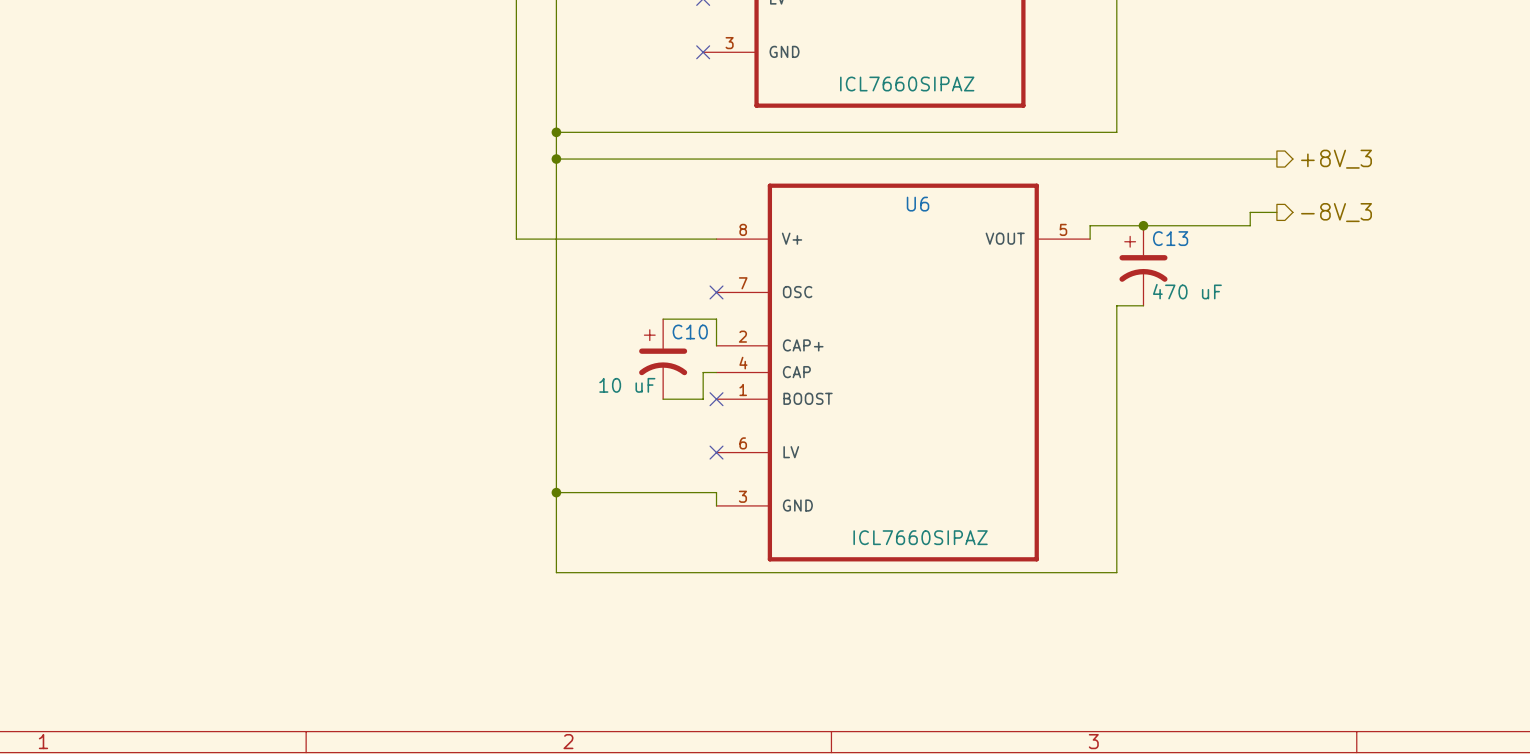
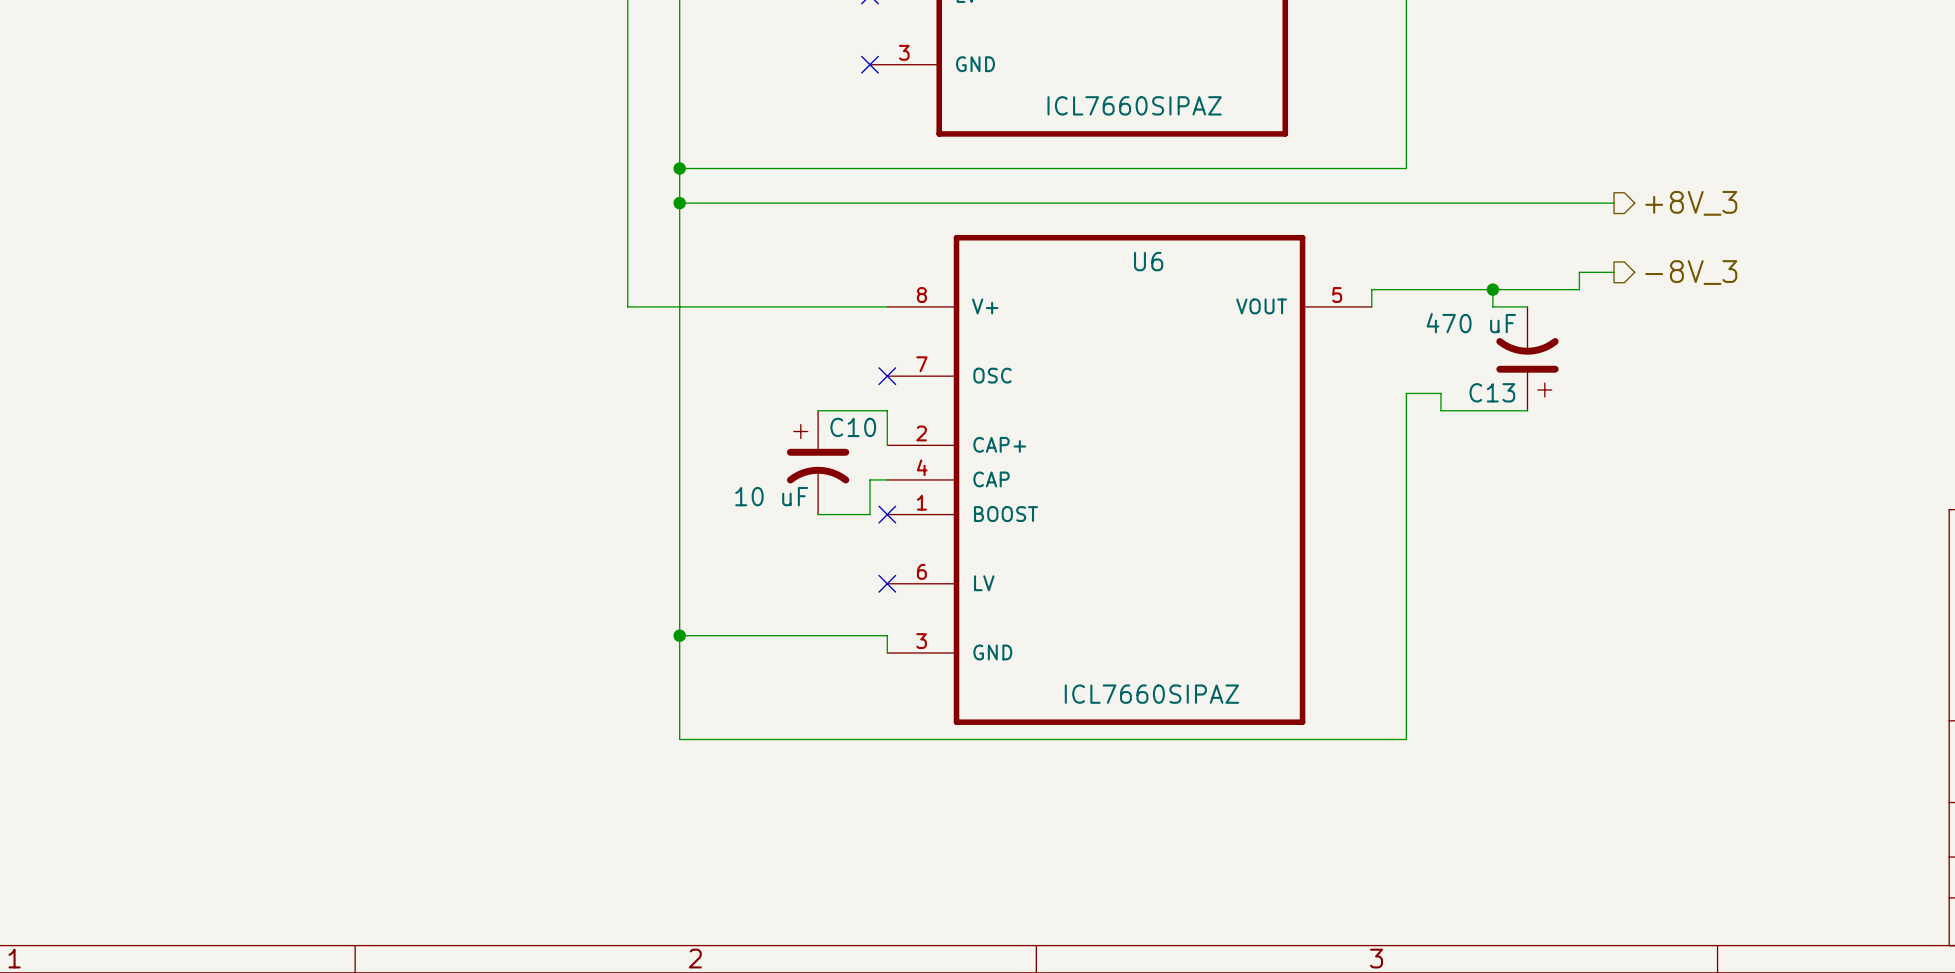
junction position: (1143, 225) -> (1492, 289)
wire: none -> (1492, 289) (1492, 306) (1527, 306)
C13 rotation: 0° (1143, 259) -> 180° (1527, 367)
C13 position: (1143, 265) -> (1527, 358)
wire: none -> (1440, 393) (1440, 410) (1527, 410)

